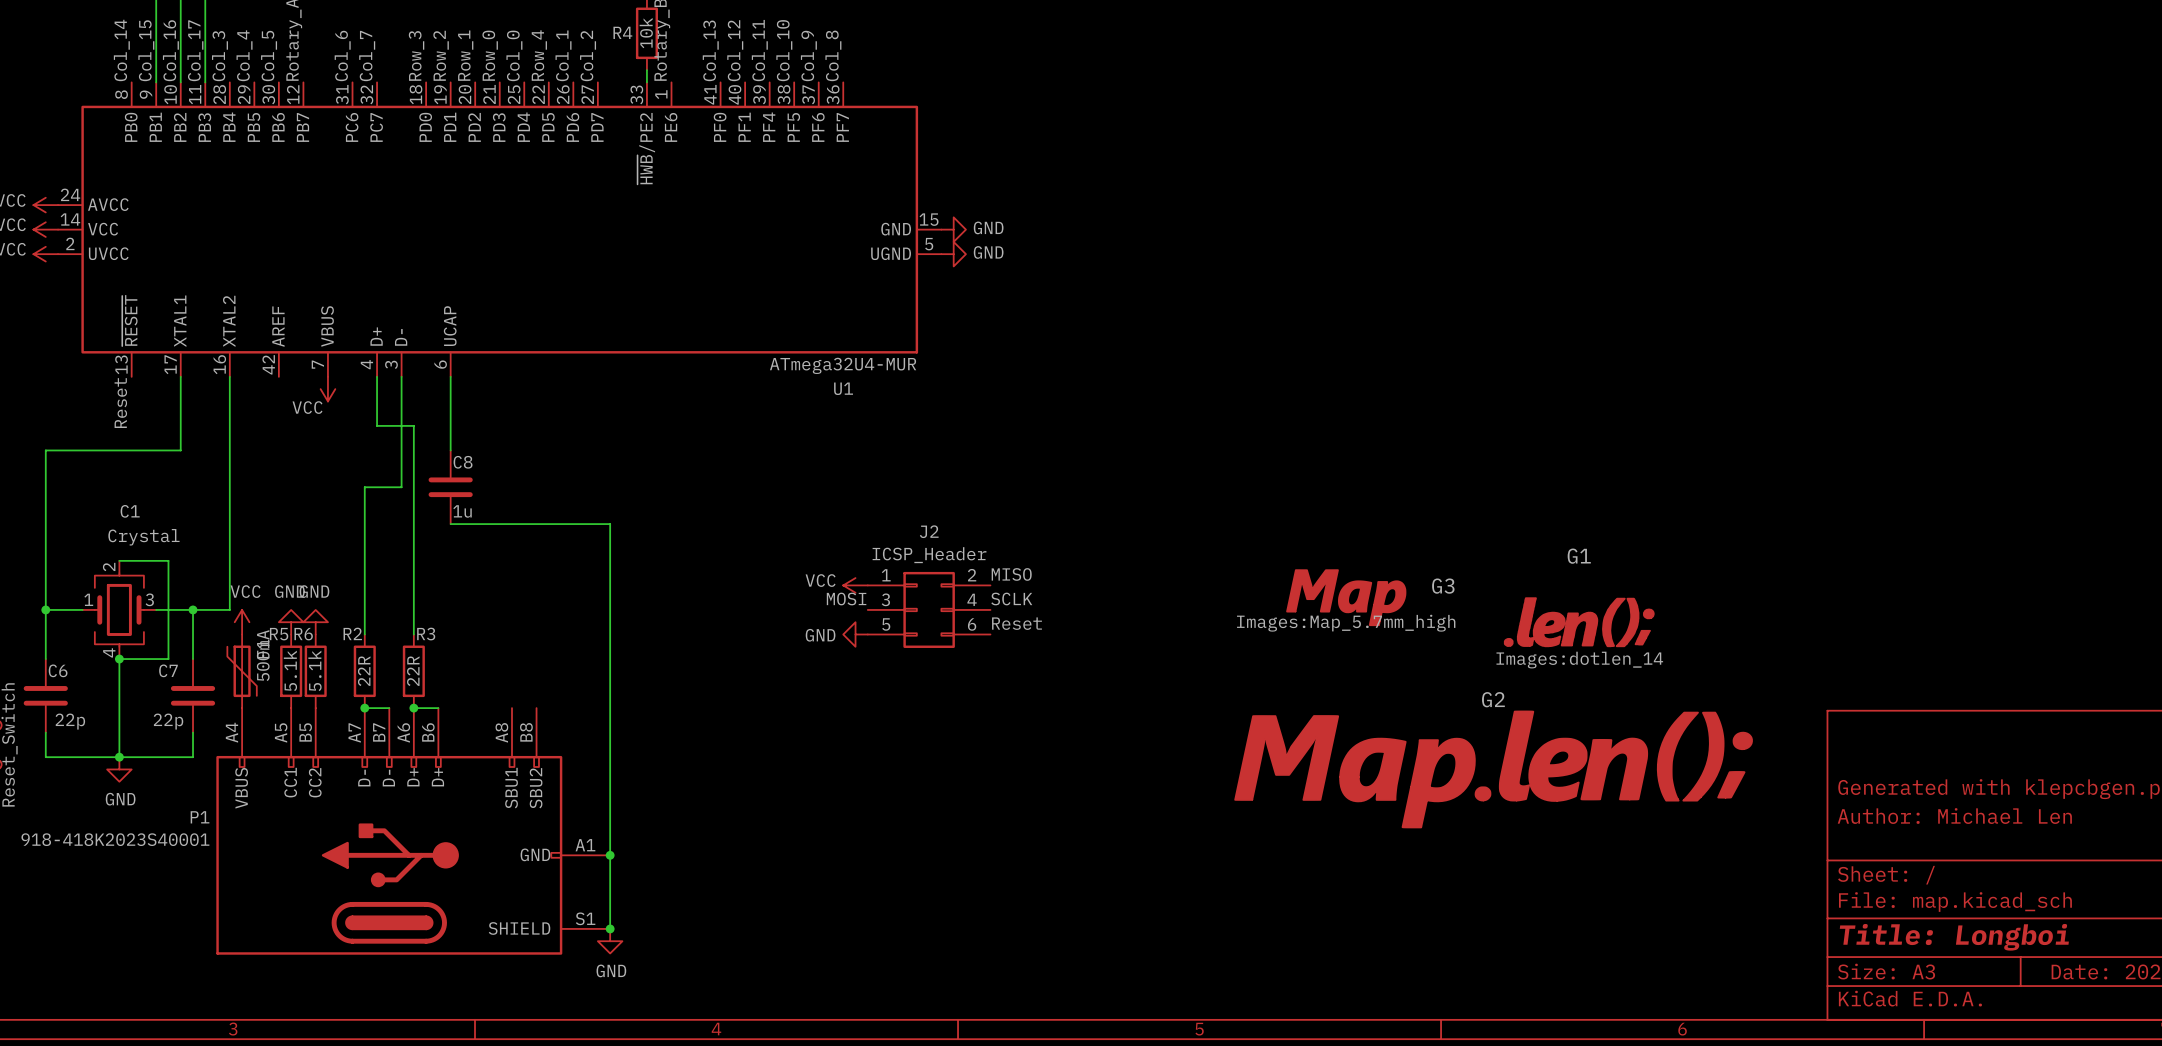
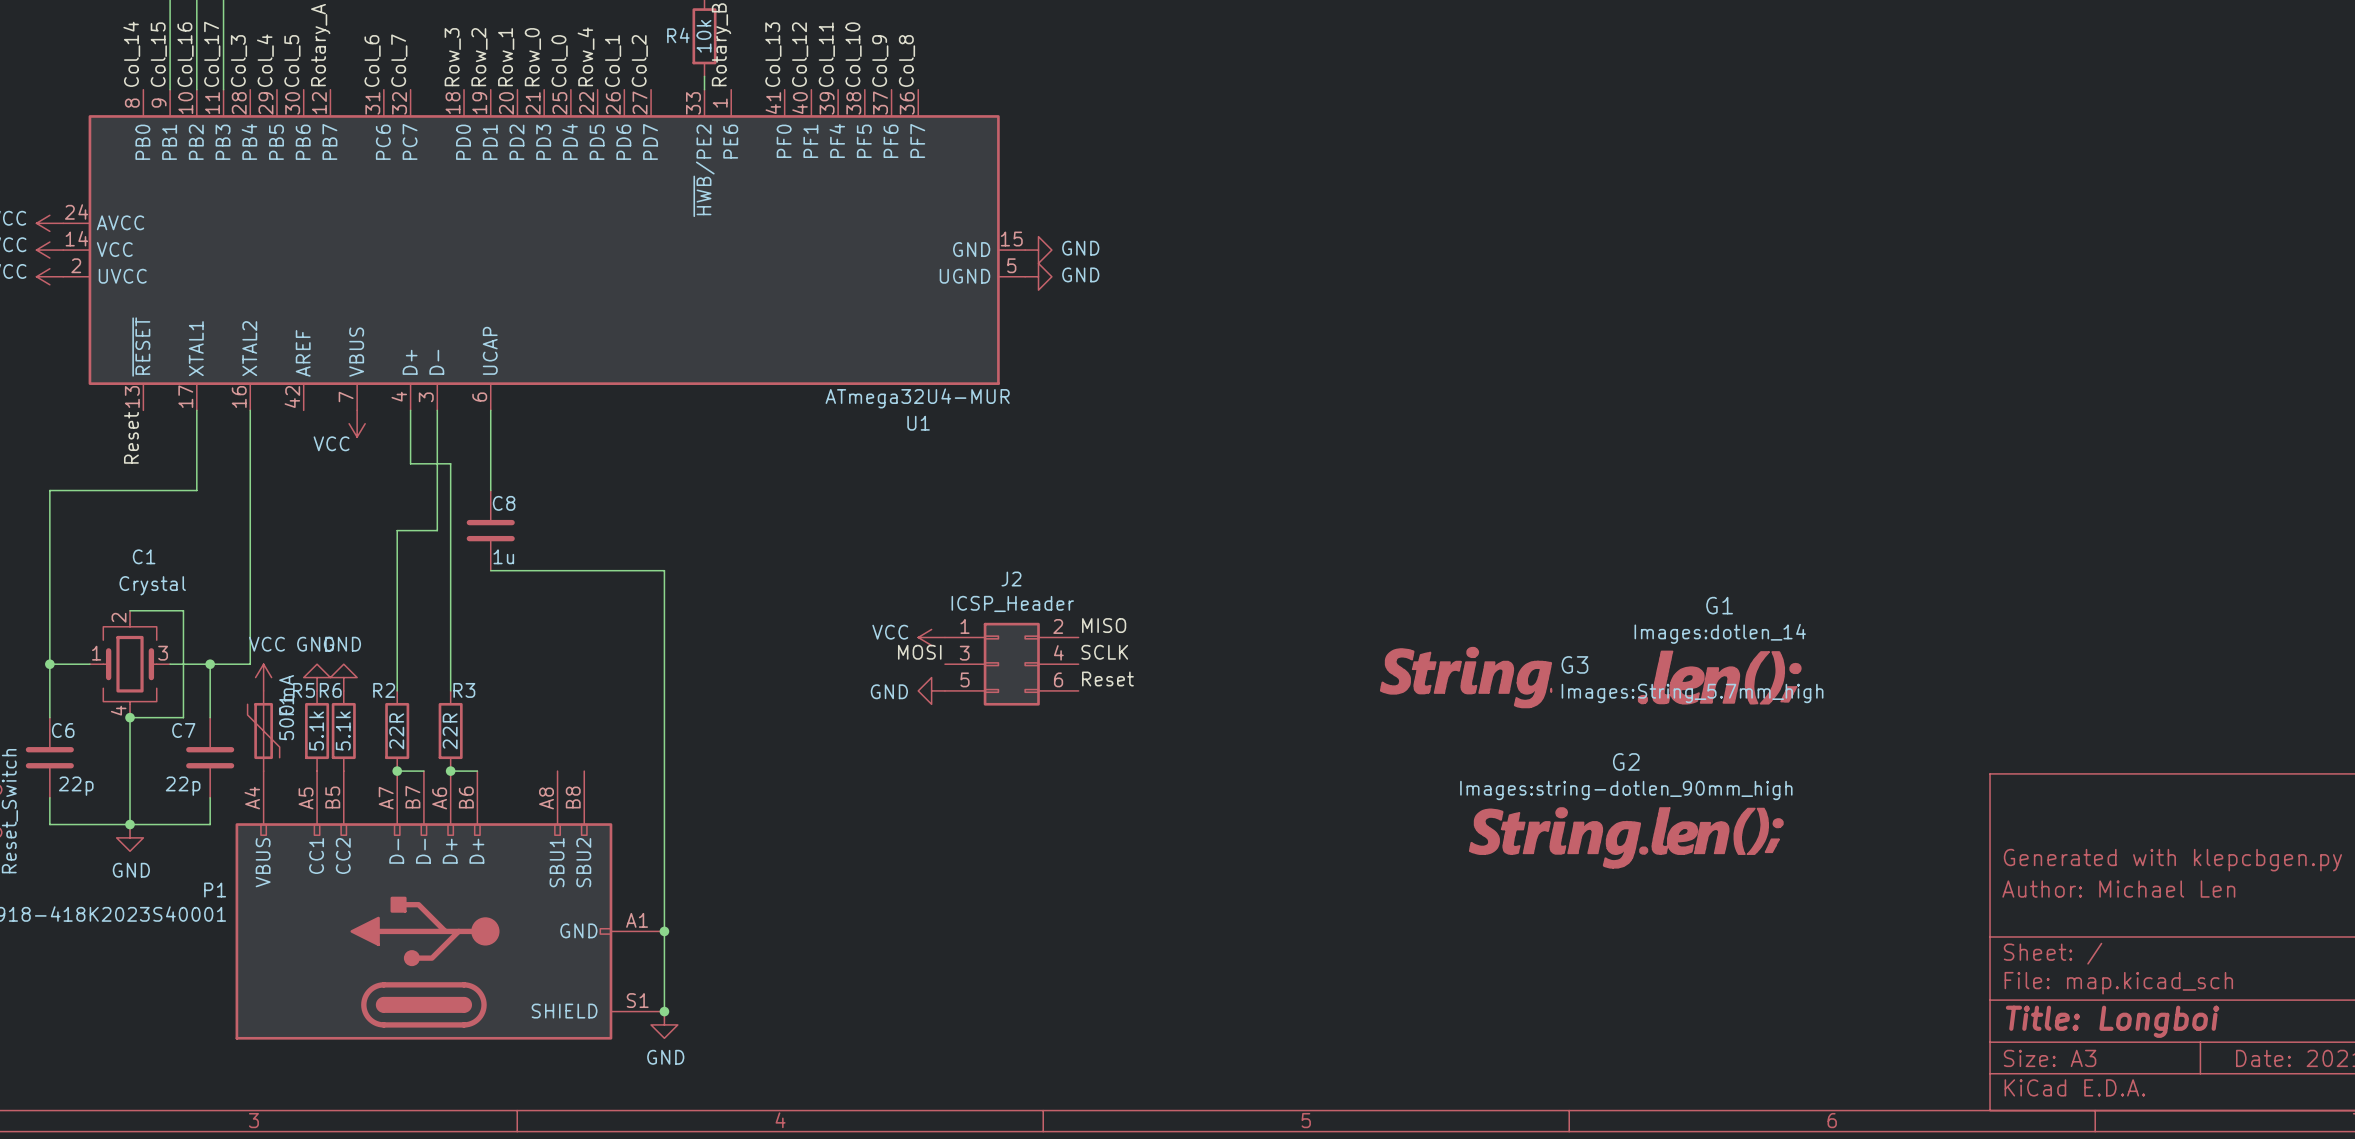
G3 symbol: [1286, 570, 1406, 626] -> [1380, 647, 1552, 708]
G3 text: Images:Map_5.7mm_high (1346, 623) -> Images:String_5.7mm_high (1692, 693)
G1 text position: Images:dotlen_14 (1579, 660) -> Images:dotlen_14 (1720, 633)
G2 symbol: [1235, 711, 1753, 828] -> [1469, 807, 1784, 869]
G2 text: none -> Images:string-dotlen_90mm_high (1626, 790)

